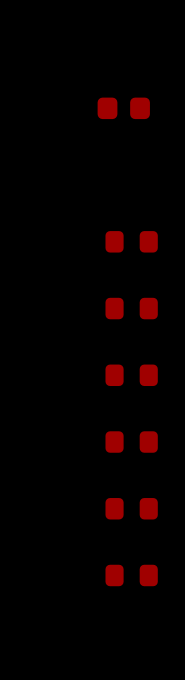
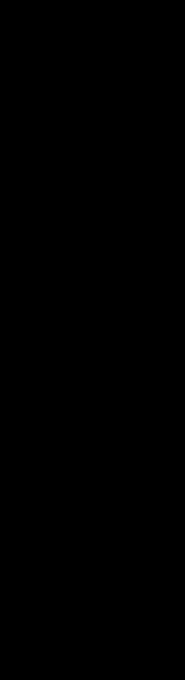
part: (123, 108) -> none
part: (131, 241) -> none
part: (131, 308) -> none
part: (131, 375) -> none
part: (131, 442) -> none
part: (131, 508) -> none
part: (131, 575) -> none

